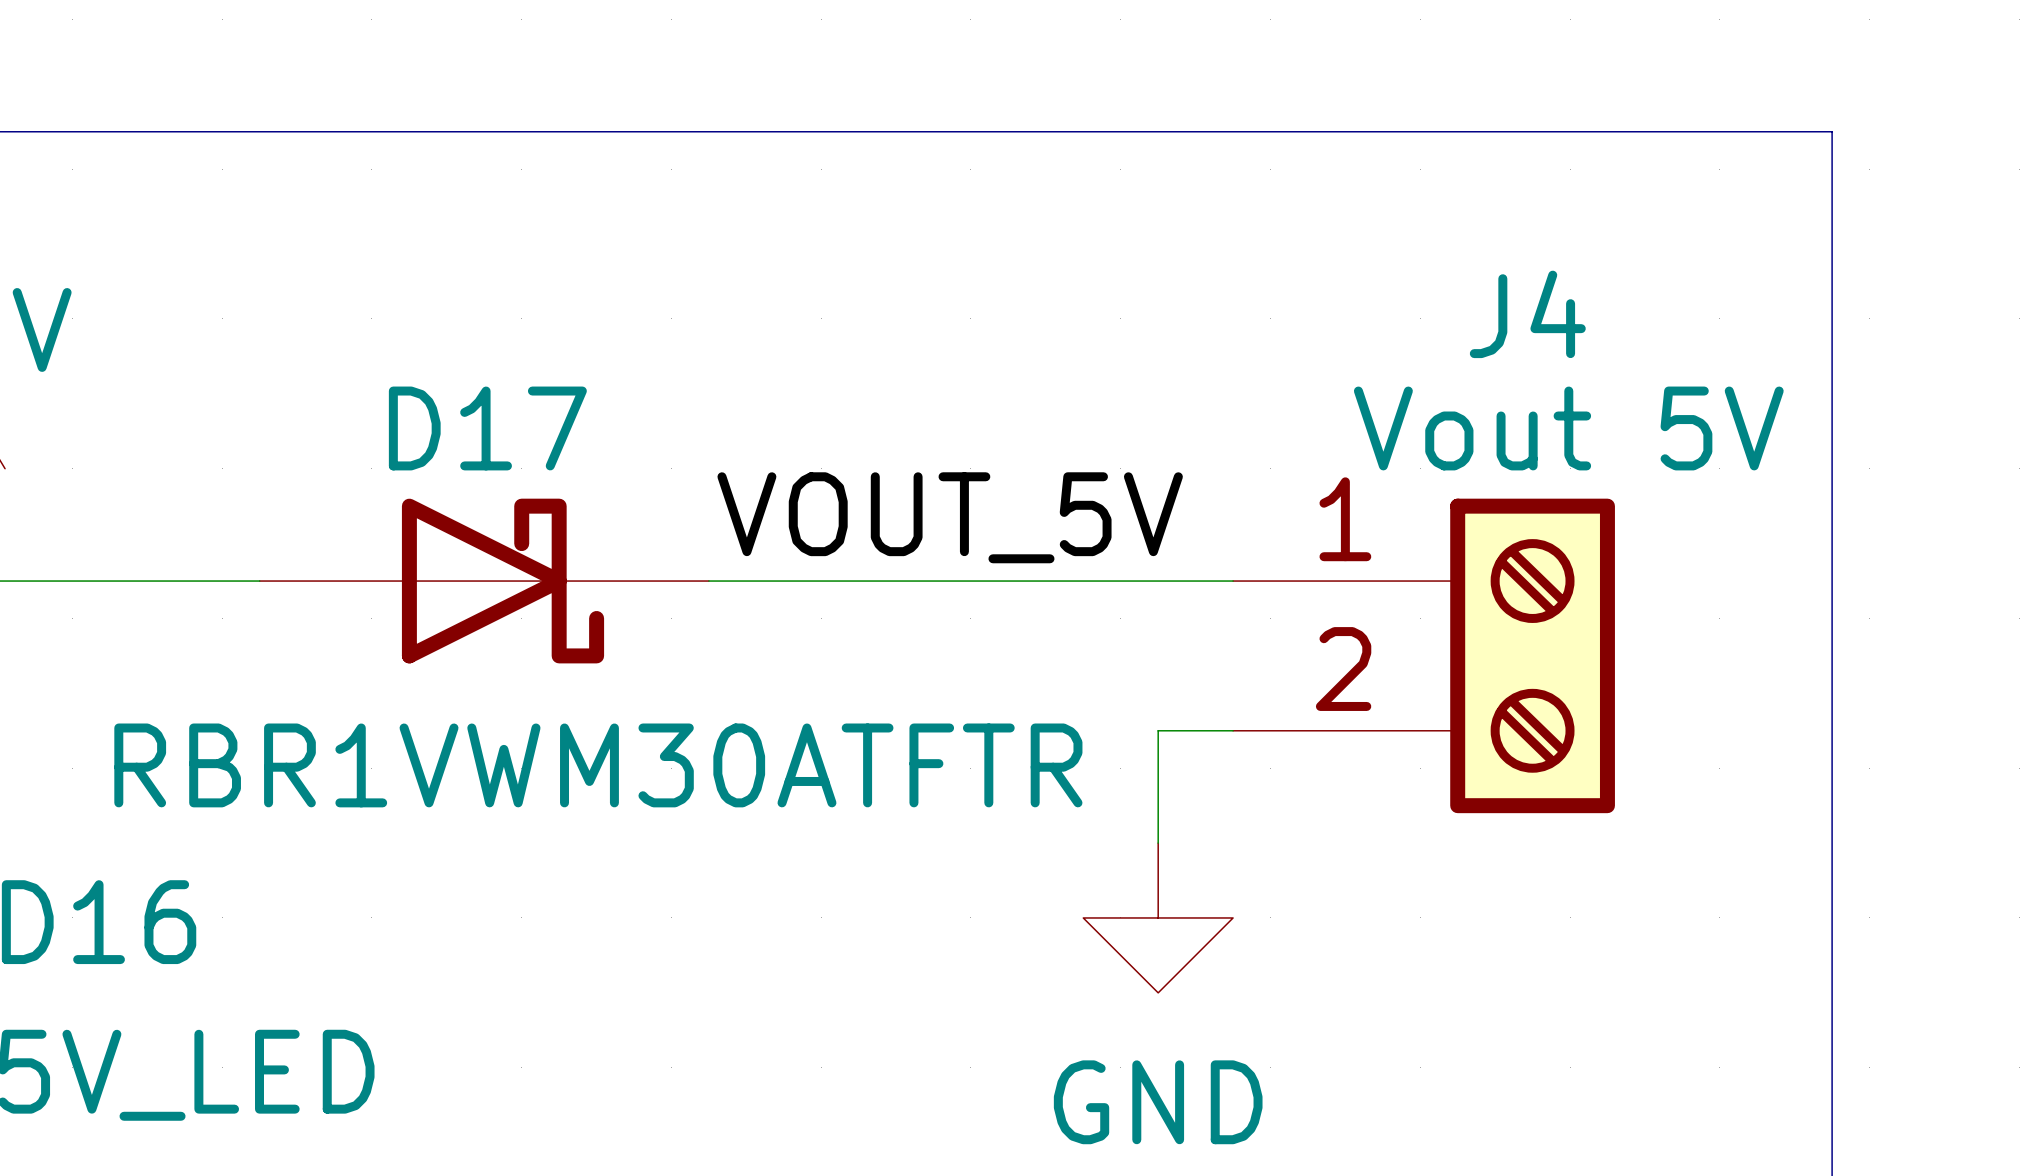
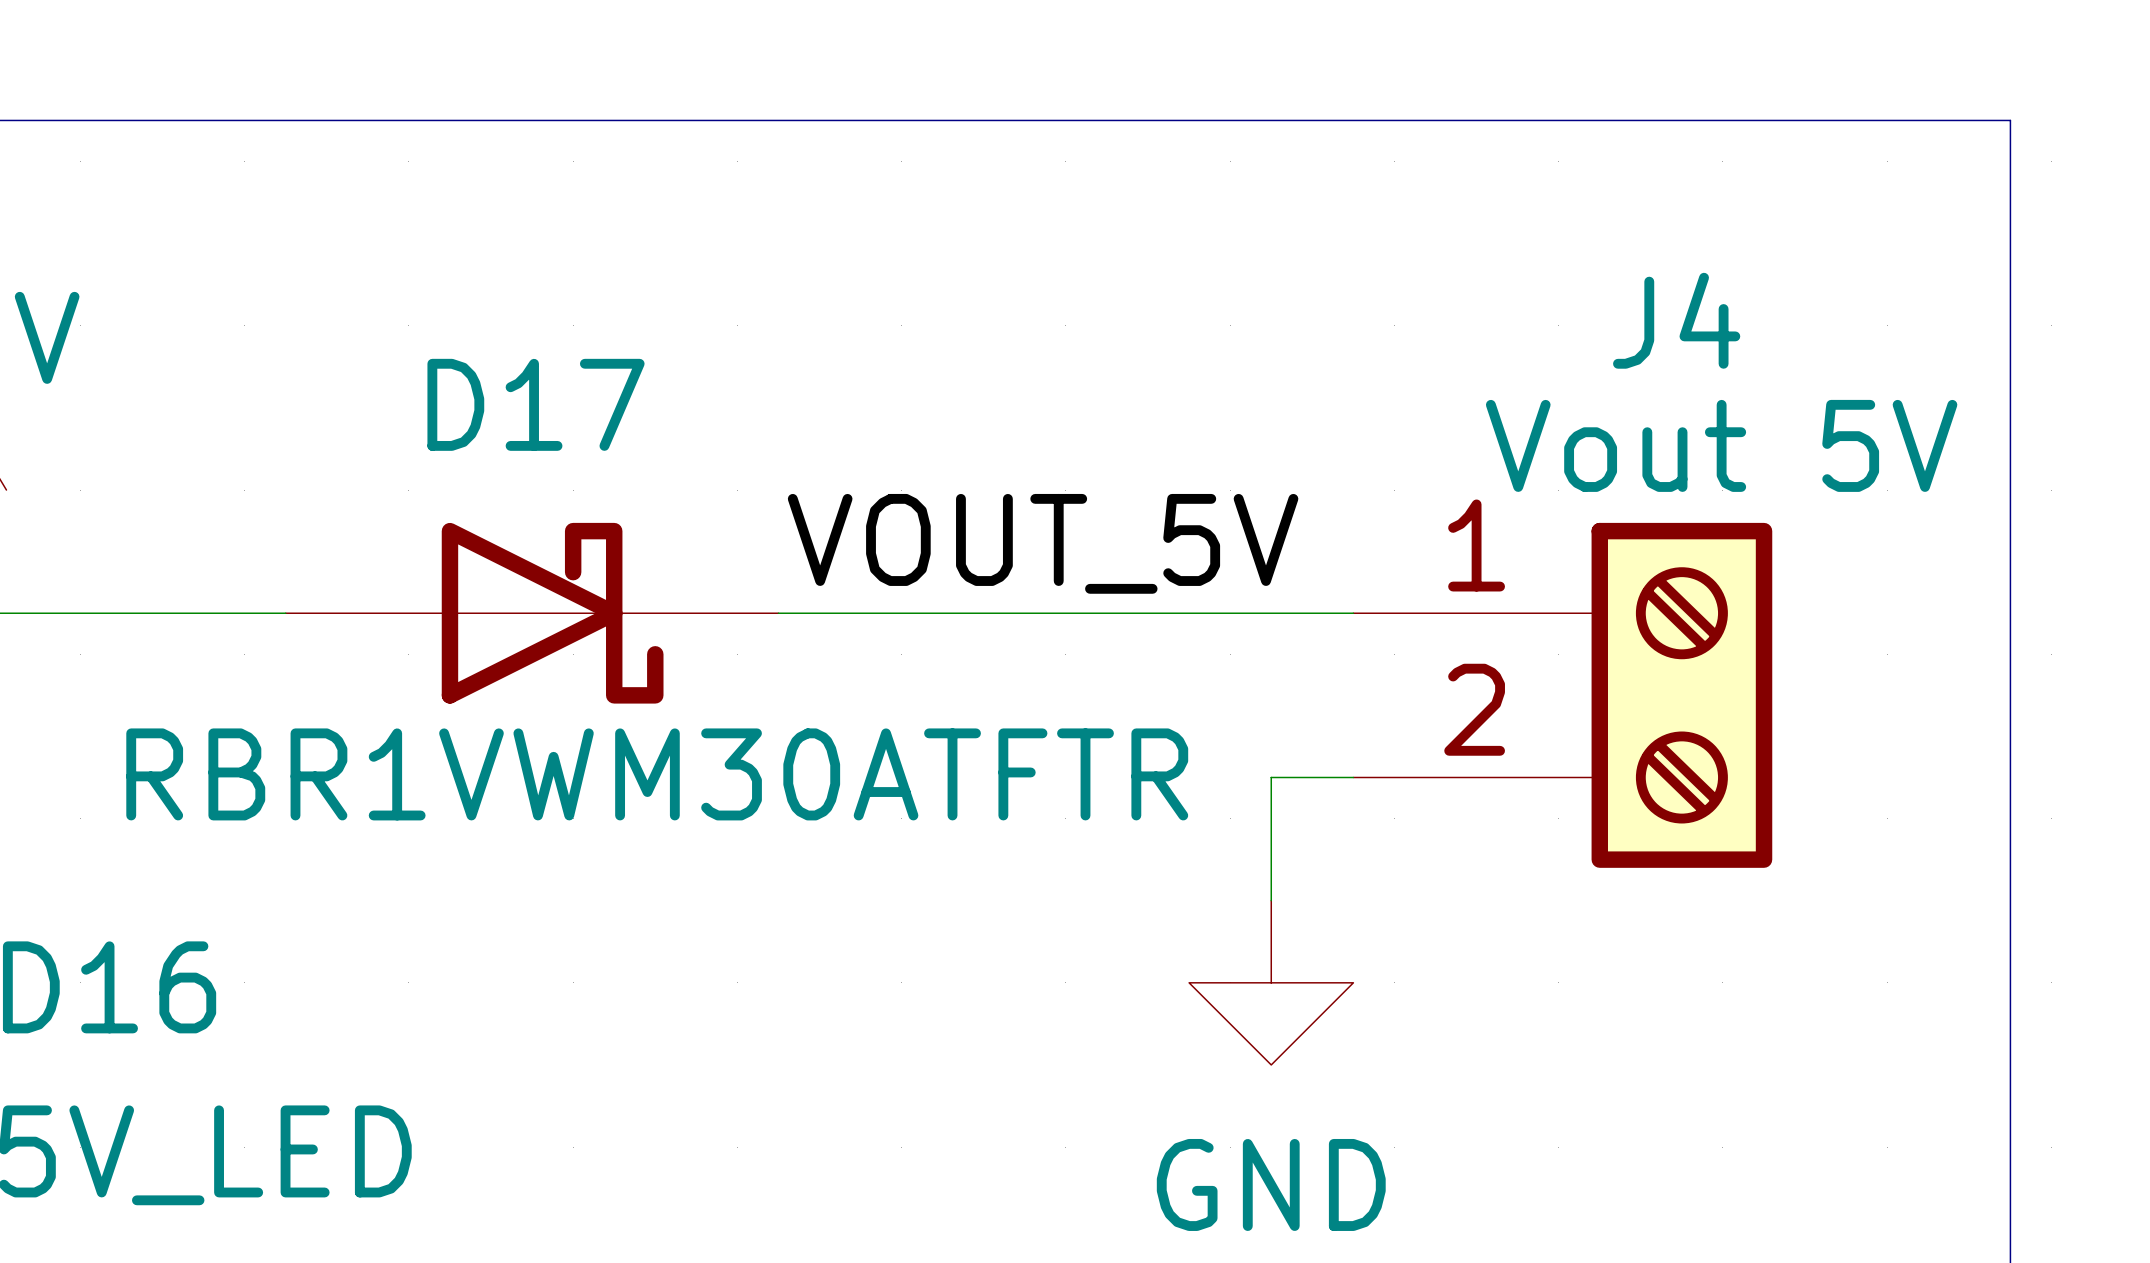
D17 name position: D17 (487, 428) -> D17 (536, 404)
D17 value position: RBR1VWM30ATFTR (598, 765) -> RBR1VWM30ATFTR (657, 774)

